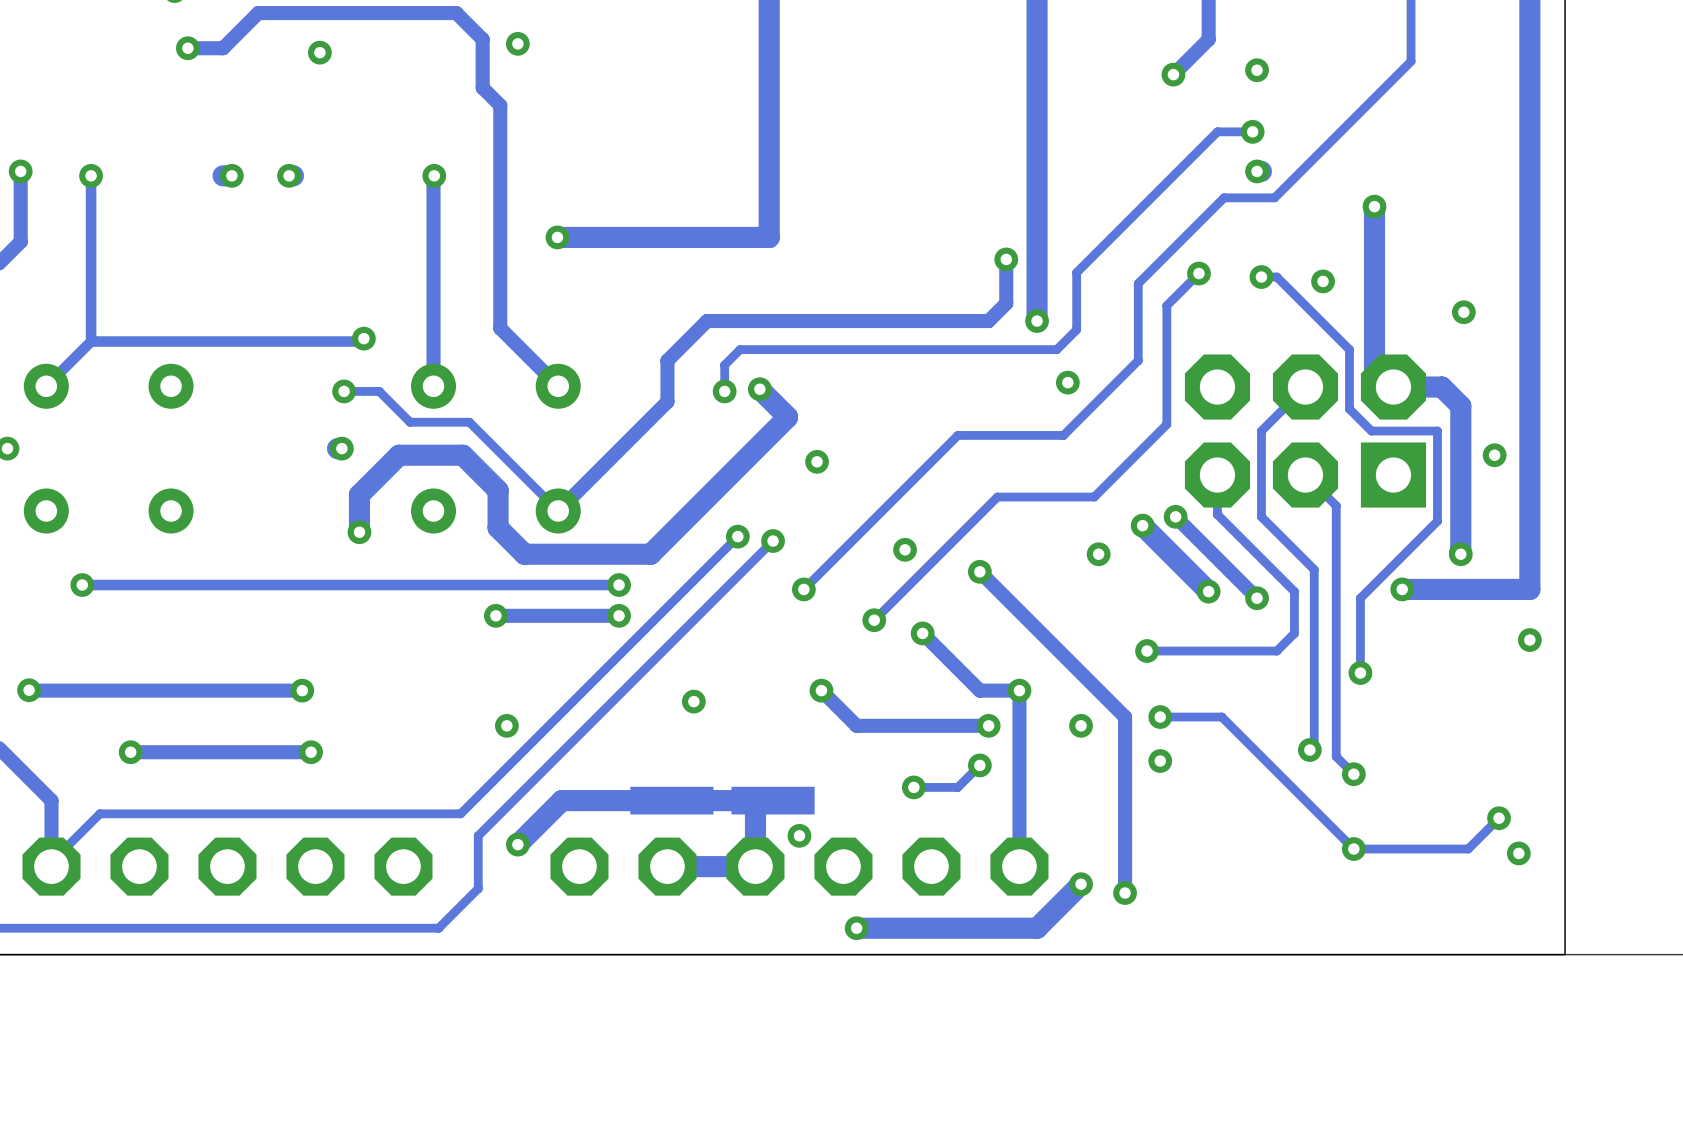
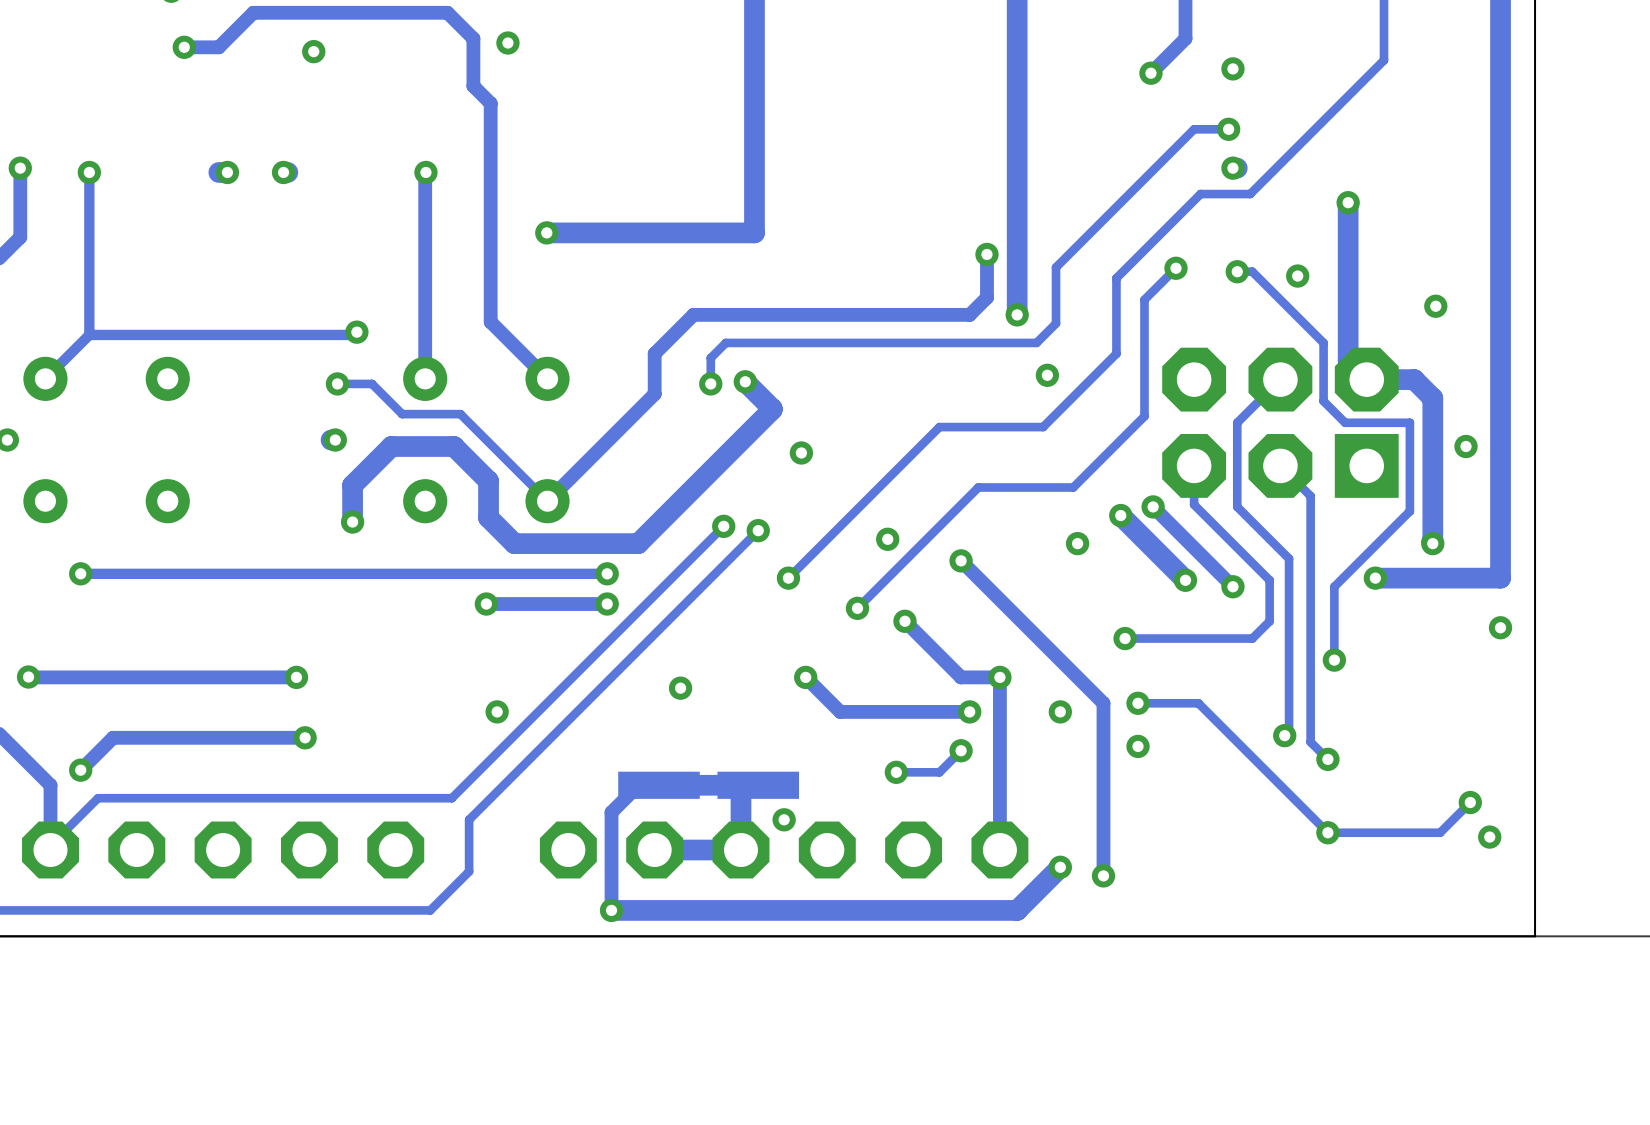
track: none -> (128, 737) (113, 737) (80, 770)
via position: (130, 752) -> (80, 770)
track: (651, 800) (561, 800) (517, 844) -> (638, 785) (611, 812) (611, 910) (840, 910)
via: (517, 844) -> none
via: none -> (611, 910)
via: (856, 928) -> none

